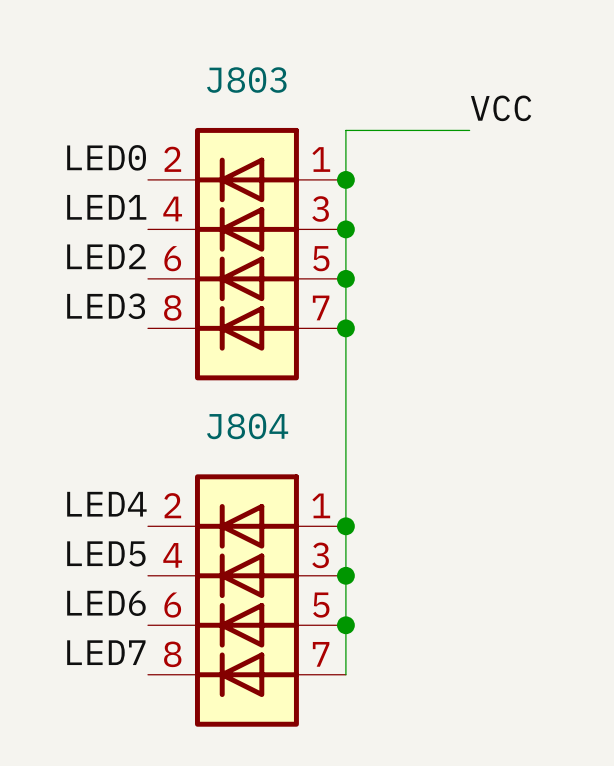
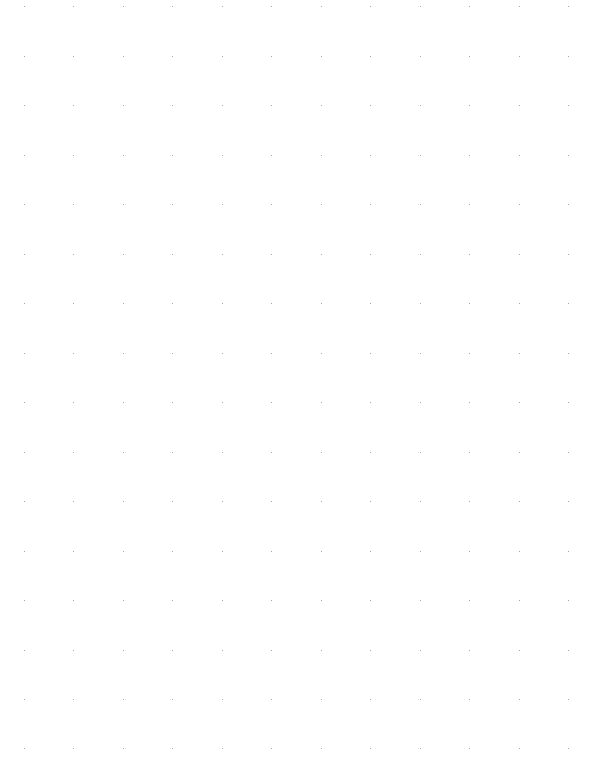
label: VCC (501, 108) -> none
wire: (469, 130) (345, 130) (345, 674) -> none
label: LED0 (106, 157) -> none
junction: (345, 179) -> none
label: LED1 (106, 207) -> none
junction: (345, 229) -> none
J803: (246, 254) -> none
label: LED2 (106, 256) -> none
junction: (345, 278) -> none
label: LED3 (106, 306) -> none
junction: (345, 328) -> none
label: LED4 (106, 504) -> none
junction: (345, 526) -> none
label: LED5 (106, 553) -> none
junction: (345, 575) -> none
J804: (246, 600) -> none
label: LED6 (106, 603) -> none
junction: (345, 625) -> none
label: LED7 (106, 652) -> none

